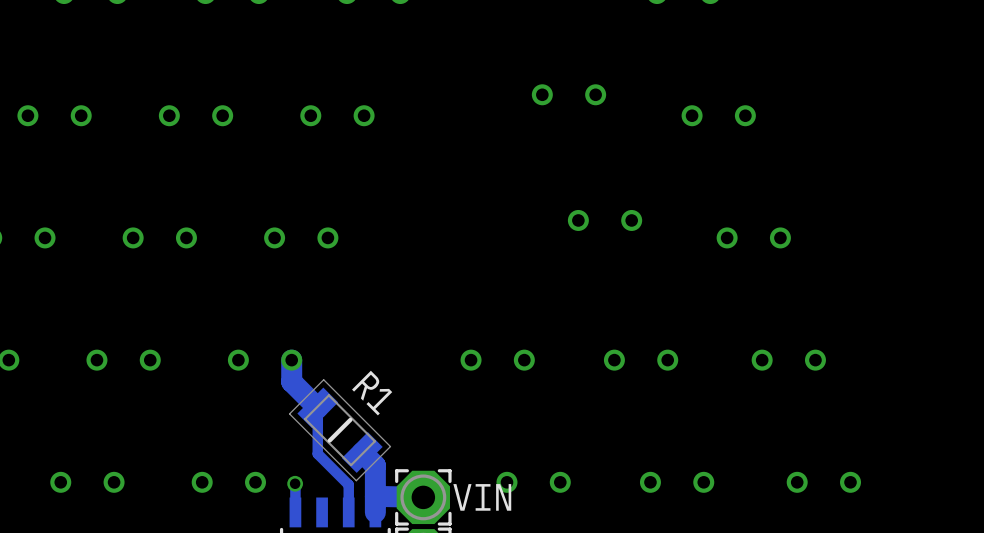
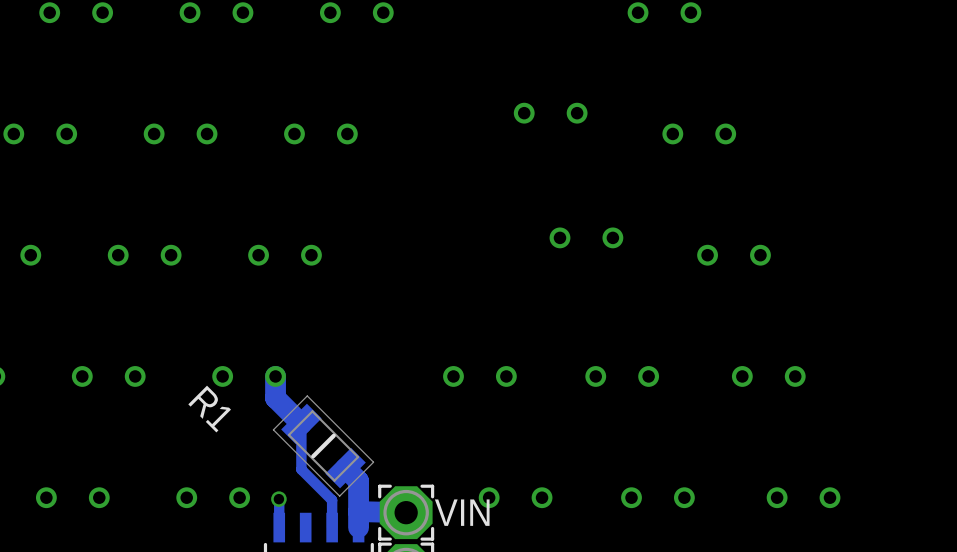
R1 name position: R1 (372, 393) -> R1 (209, 409)

